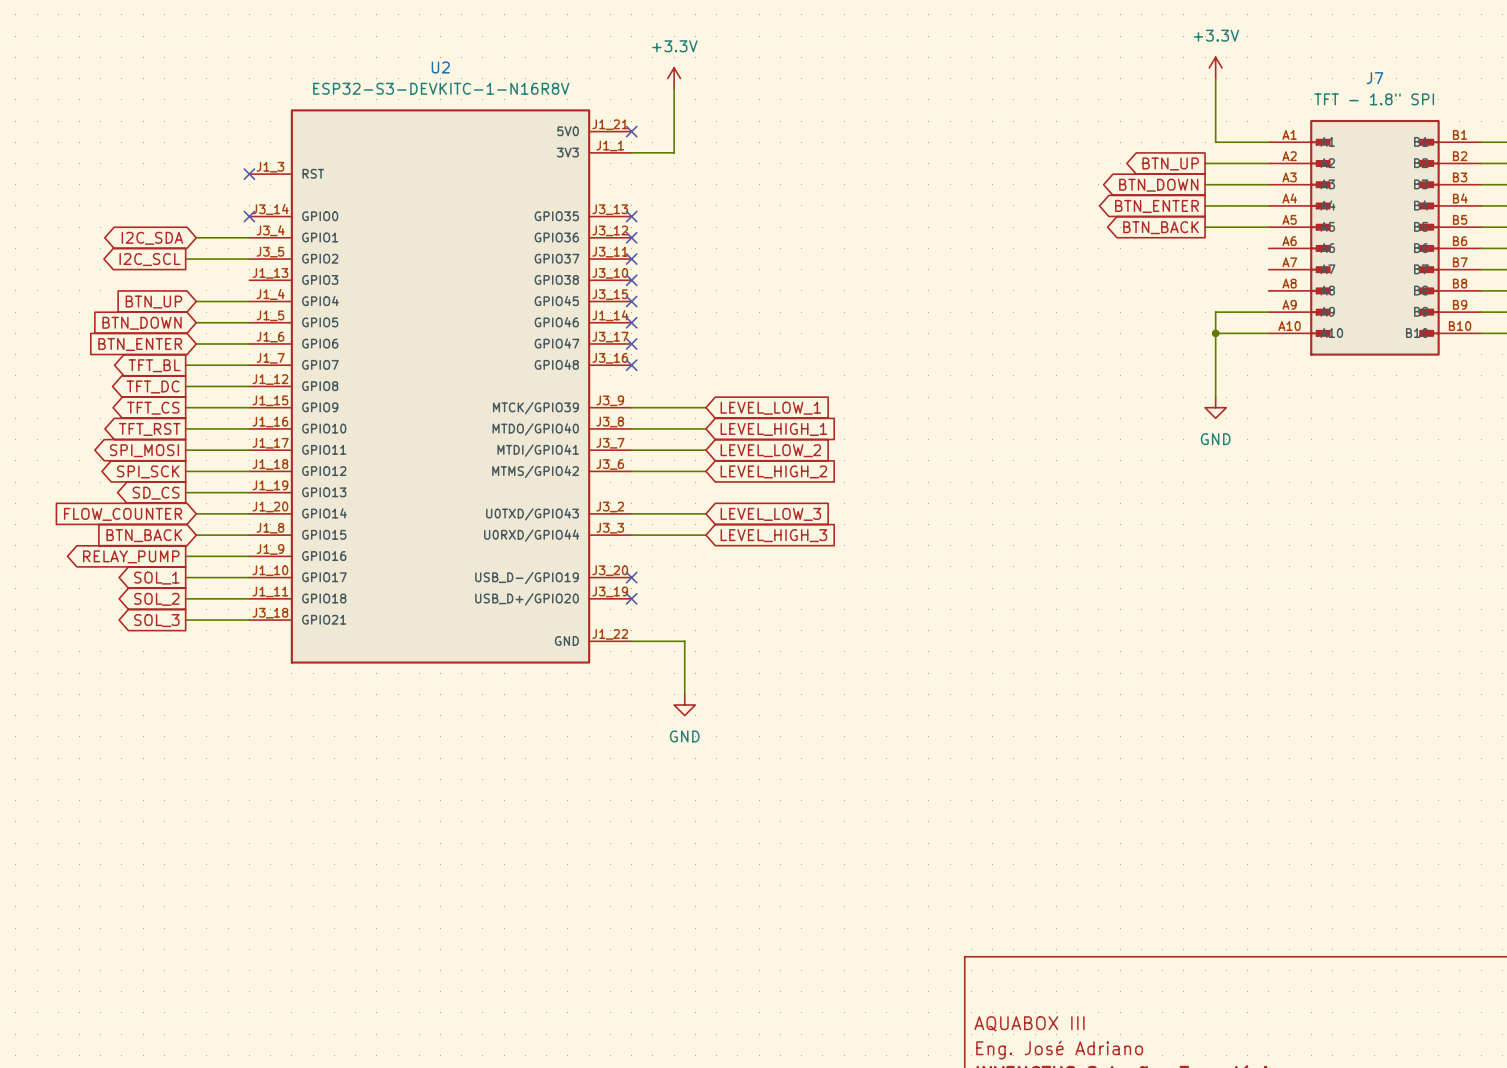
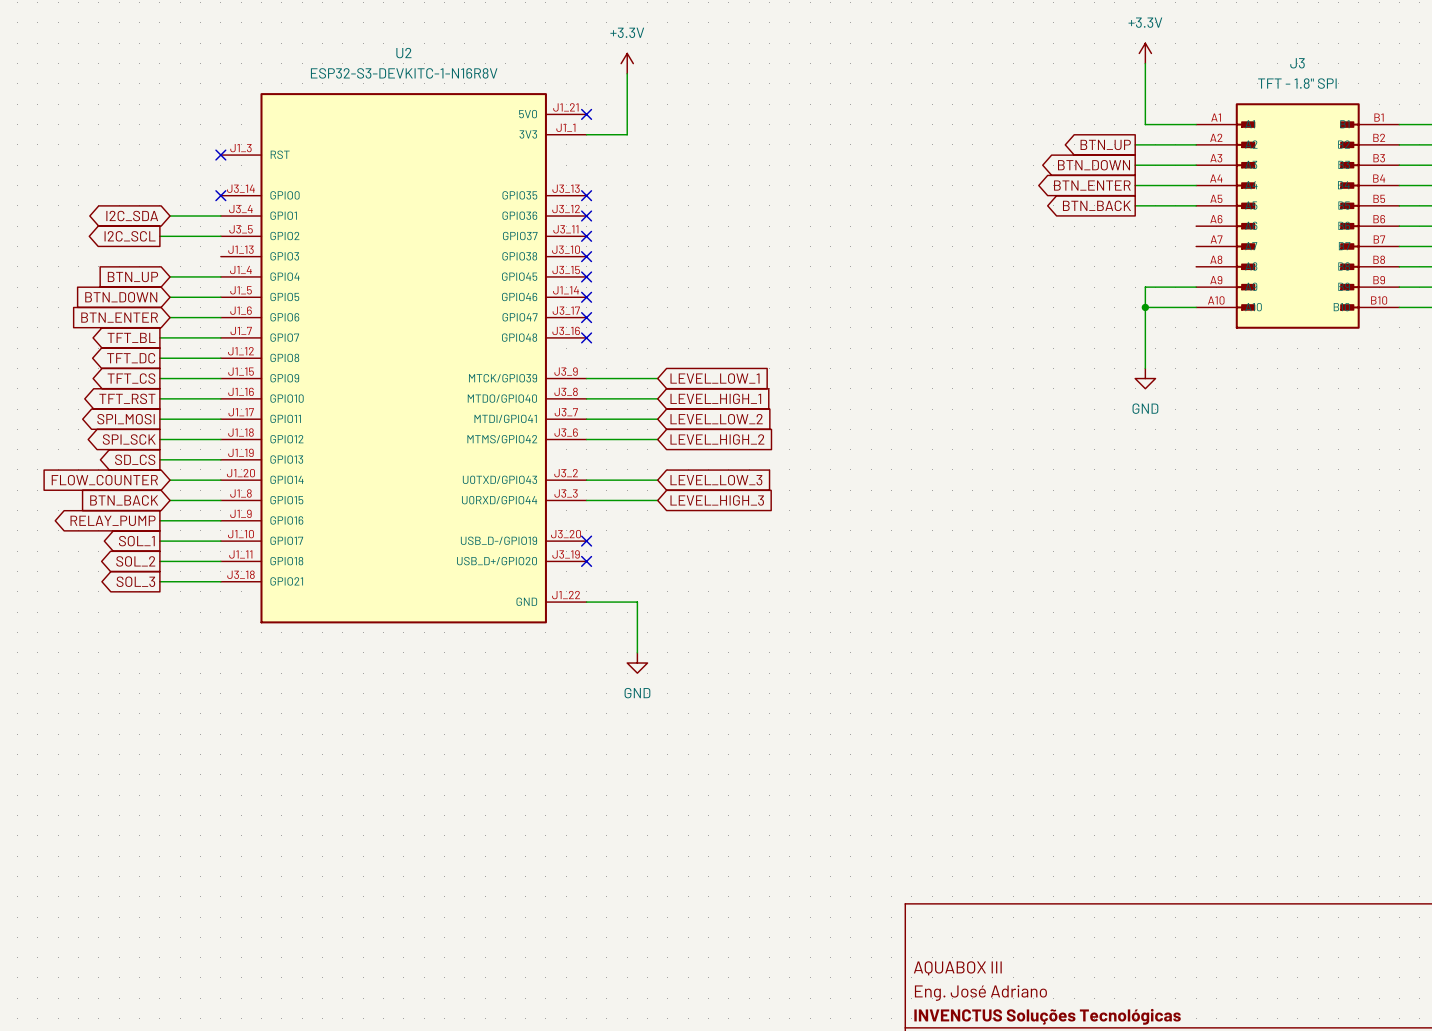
J7 name: J7 (1374, 78) -> J3 (1297, 63)

